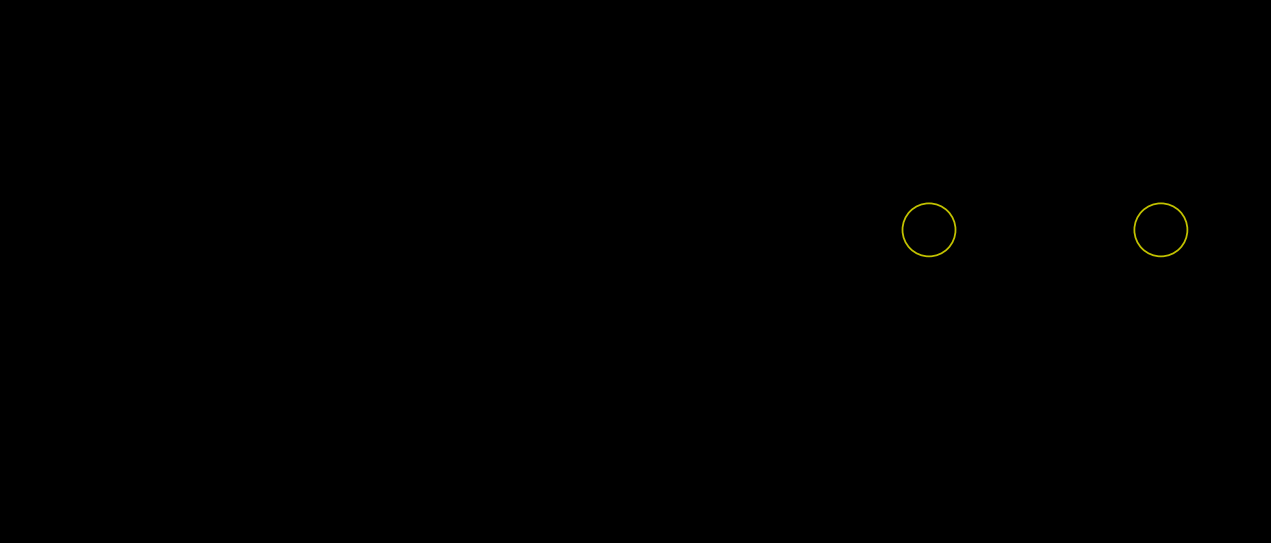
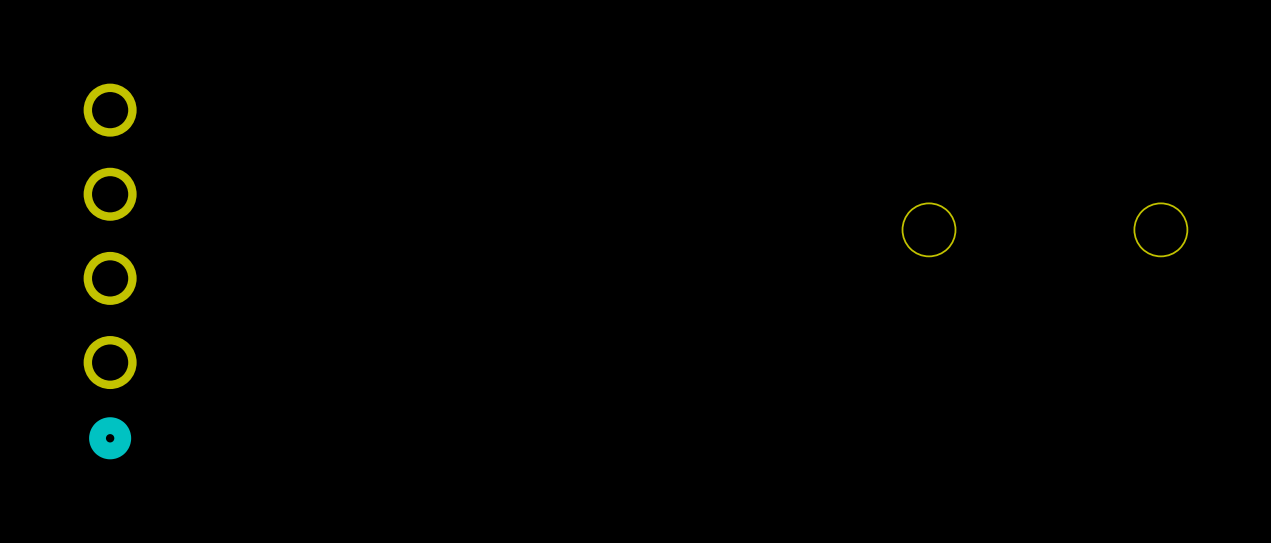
part: none -> (110, 271)

